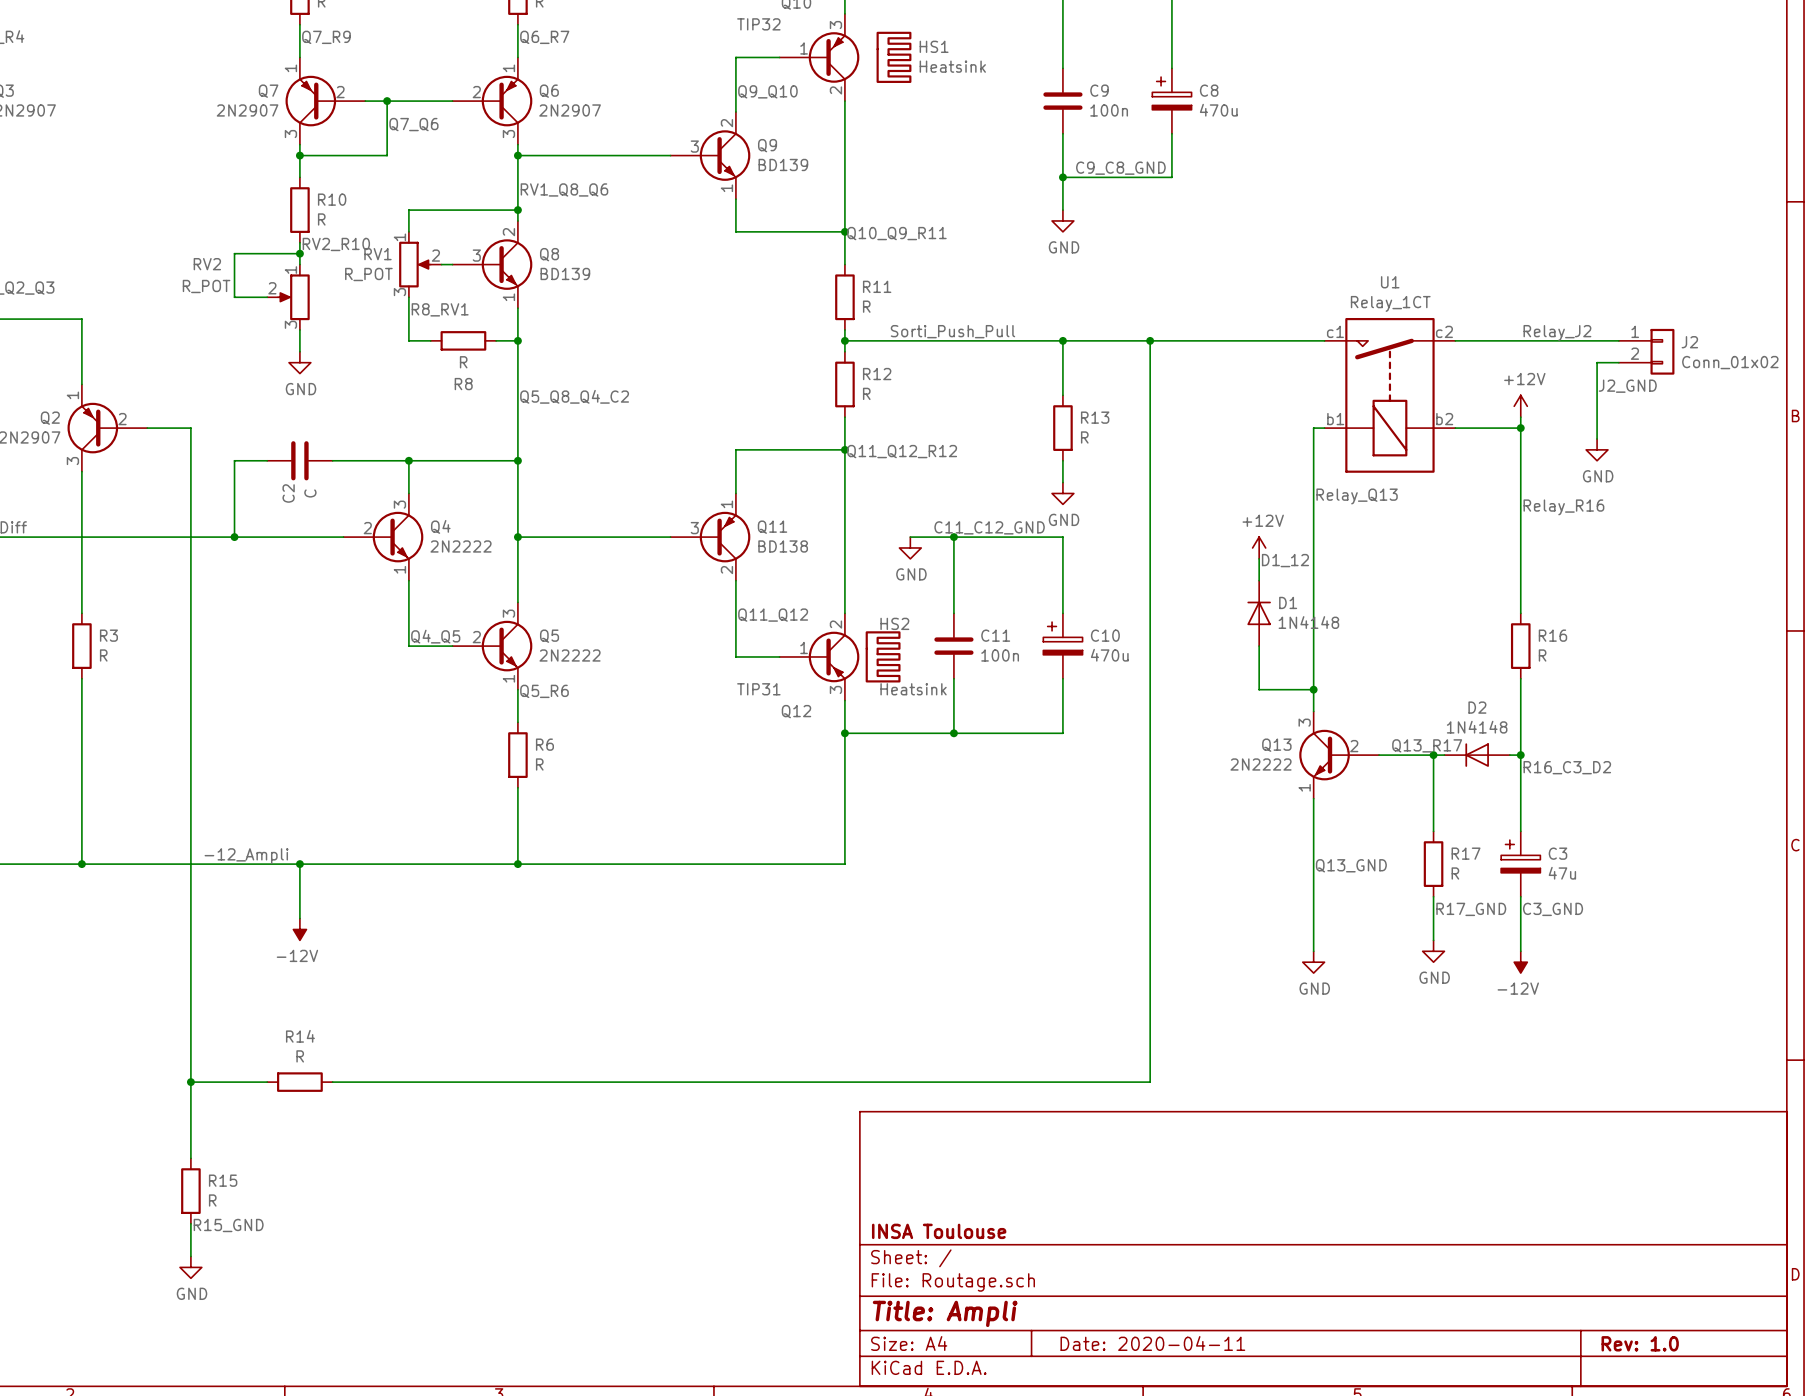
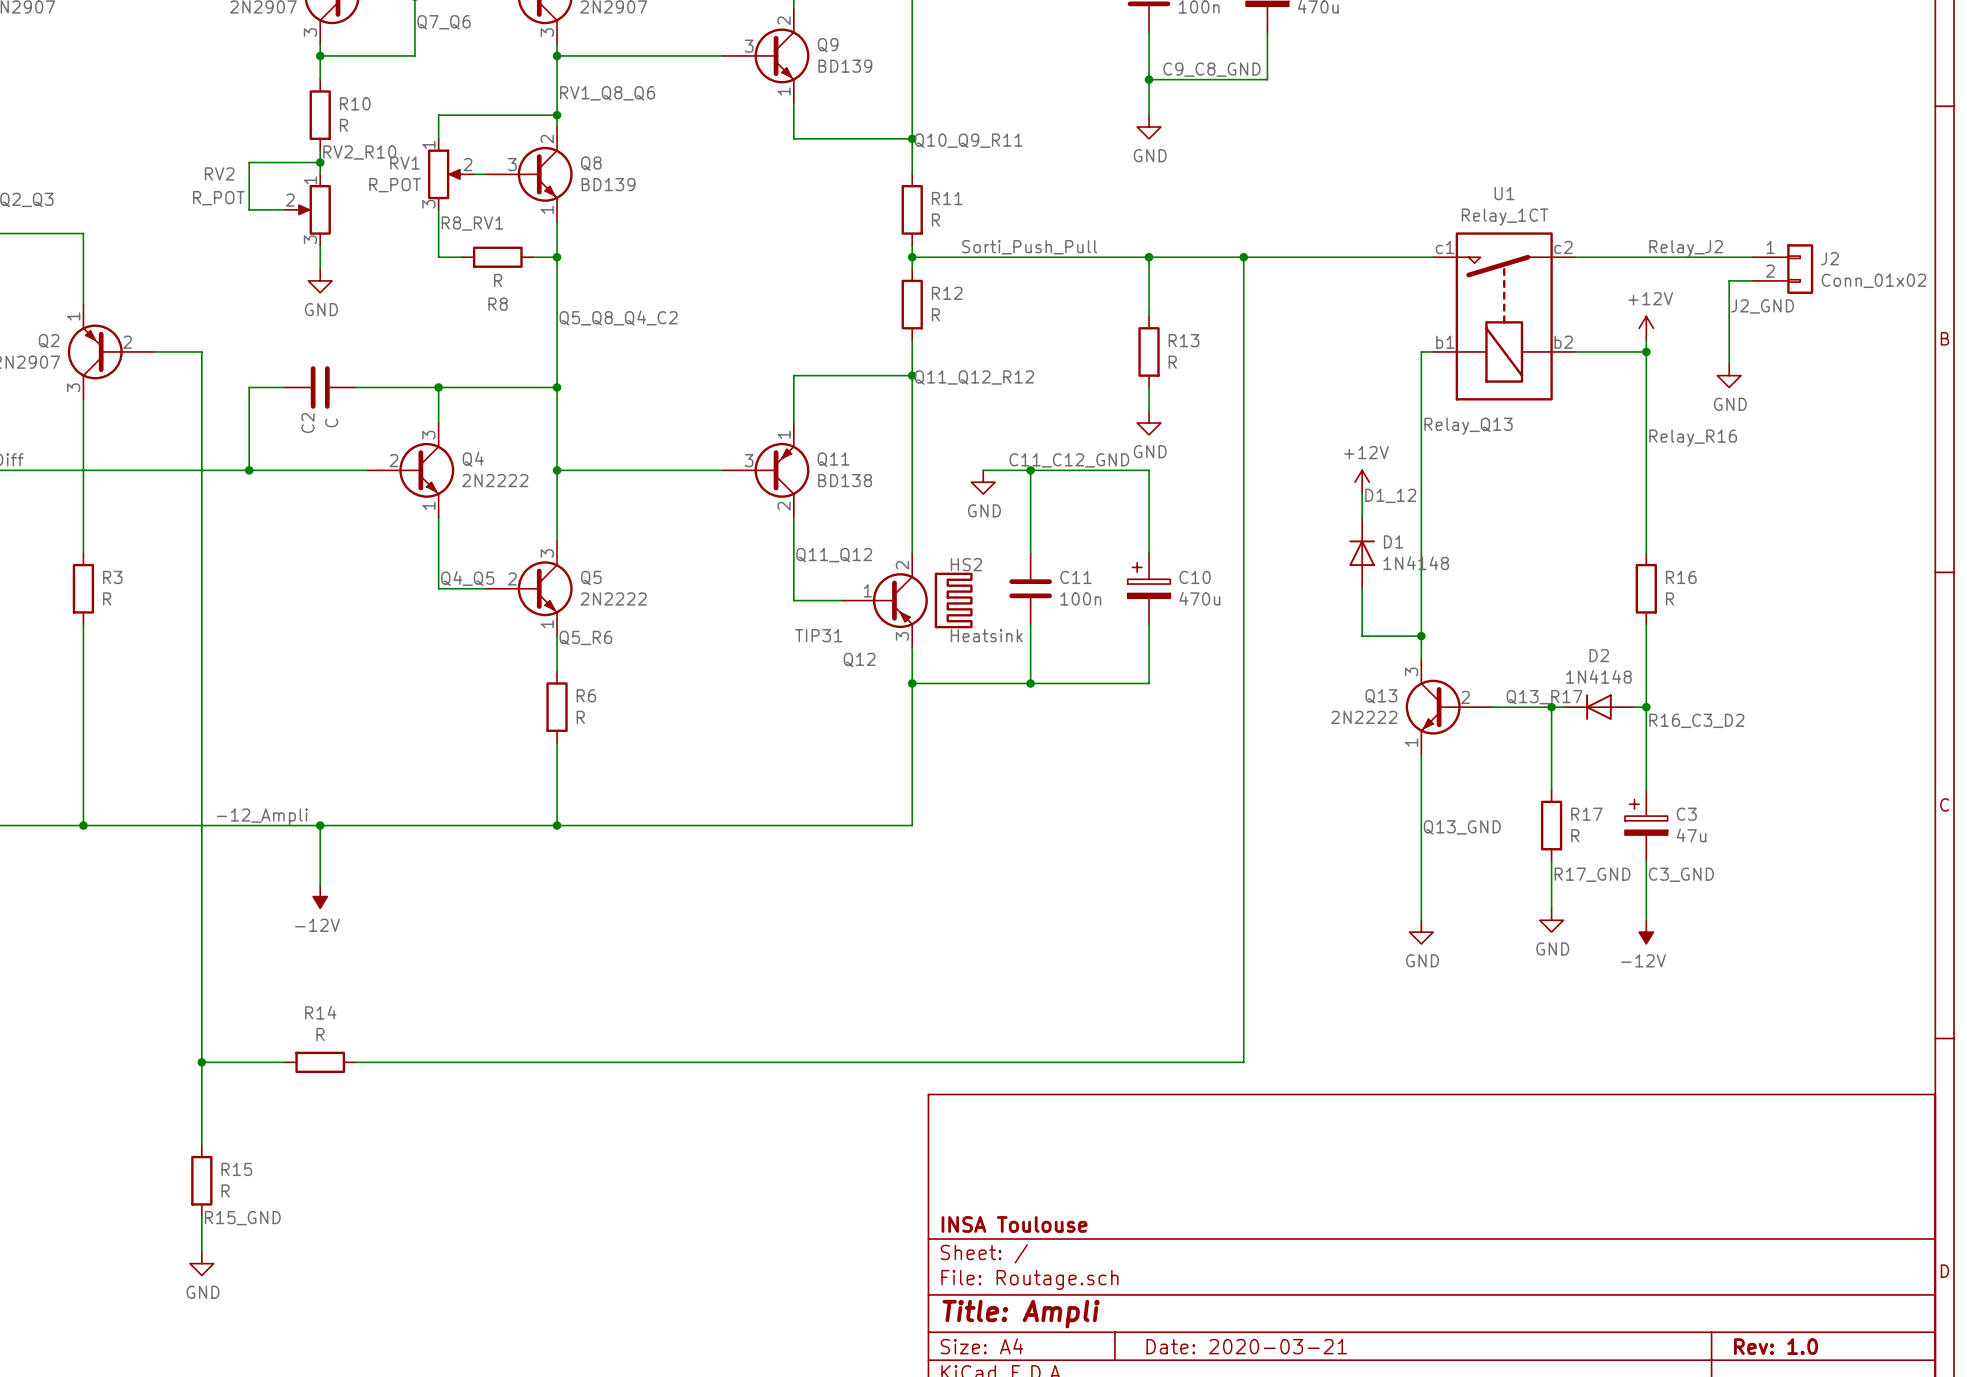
title block: Date: 2020-04-11 (1152, 1343) -> Date: 2020-03-21 (1246, 1346)

